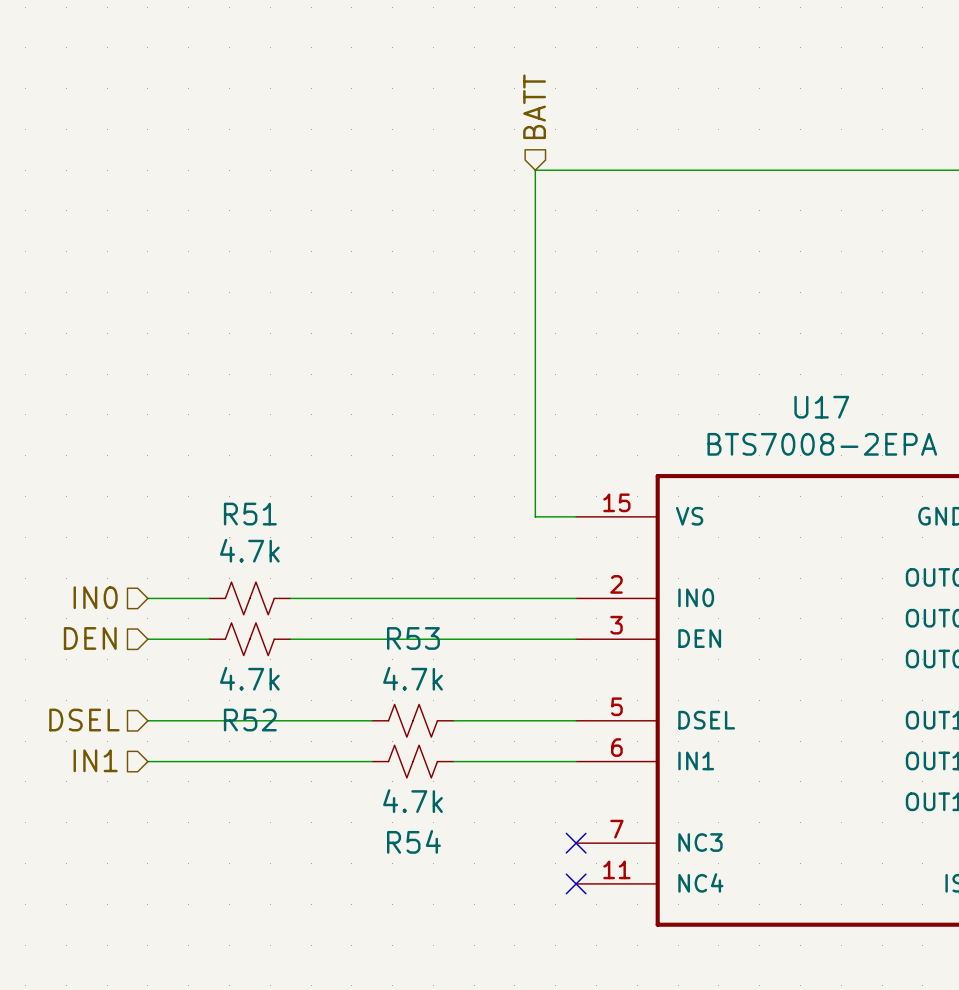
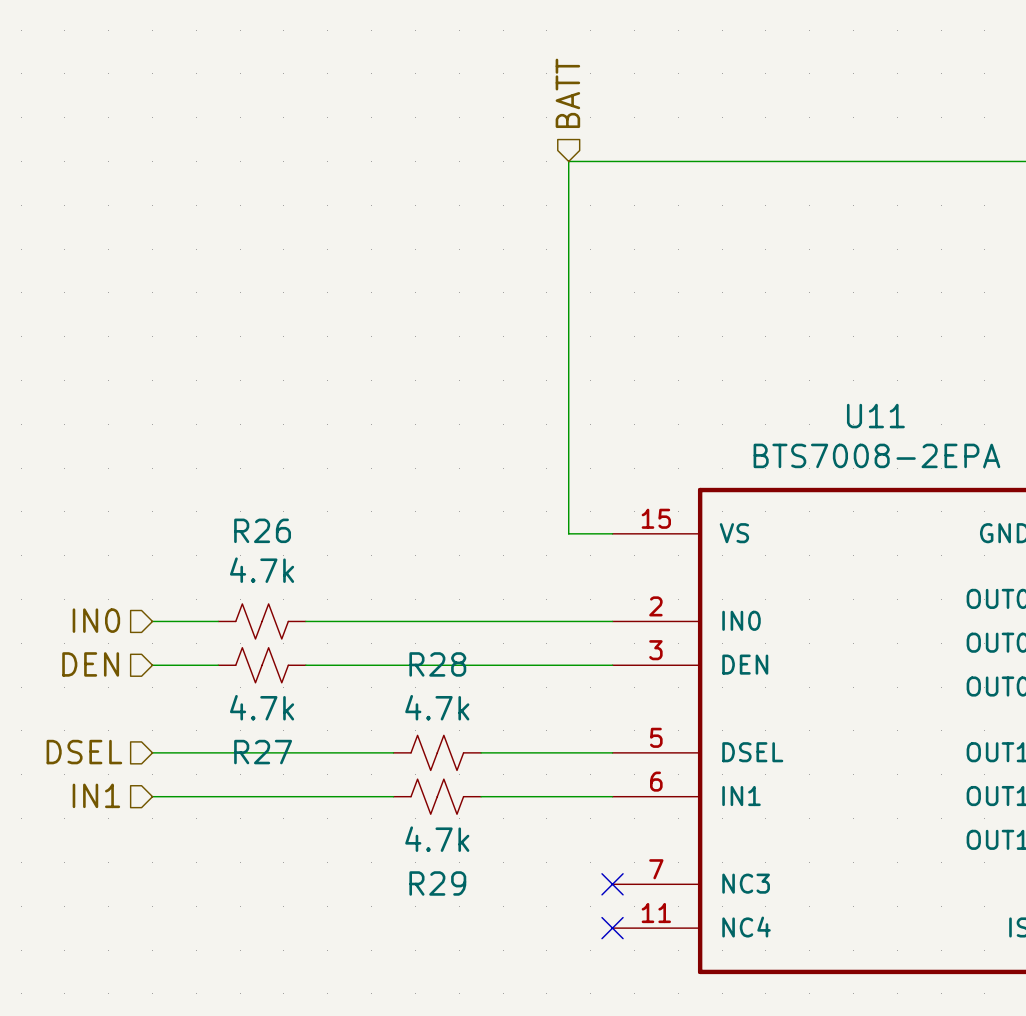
U17 name: U17 (821, 407) -> U11 (875, 416)
R51 name: R51 (250, 514) -> R26 (262, 530)
R53 name: R53 (413, 638) -> R28 (437, 664)
R52 name: R52 (250, 720) -> R27 (263, 752)
R54 name: R54 (413, 841) -> R29 (437, 883)

